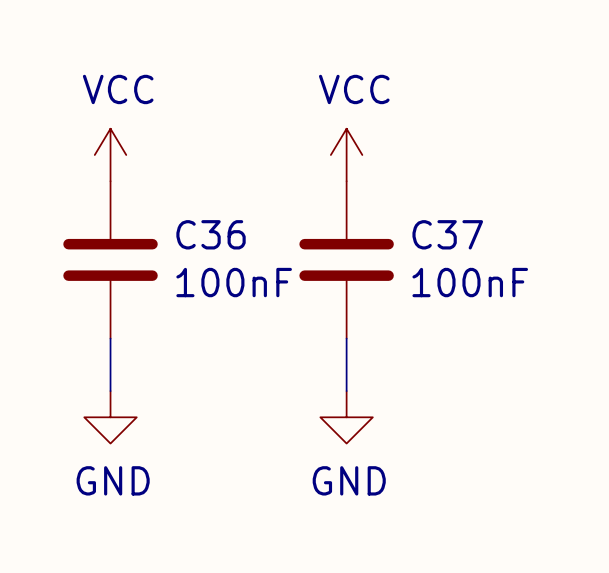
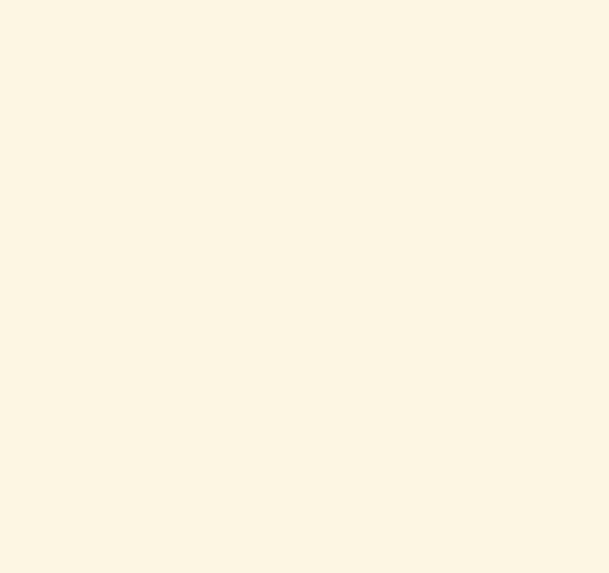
power symbol: VCC (110, 154) -> none
power symbol: VCC (346, 154) -> none
C36: 100nF (110, 259) -> none
C37: 100nF (346, 259) -> none
wire: (110, 338) (110, 391) -> none
wire: (346, 338) (346, 391) -> none
power symbol: GND (110, 417) -> none
power symbol: GND (346, 417) -> none

